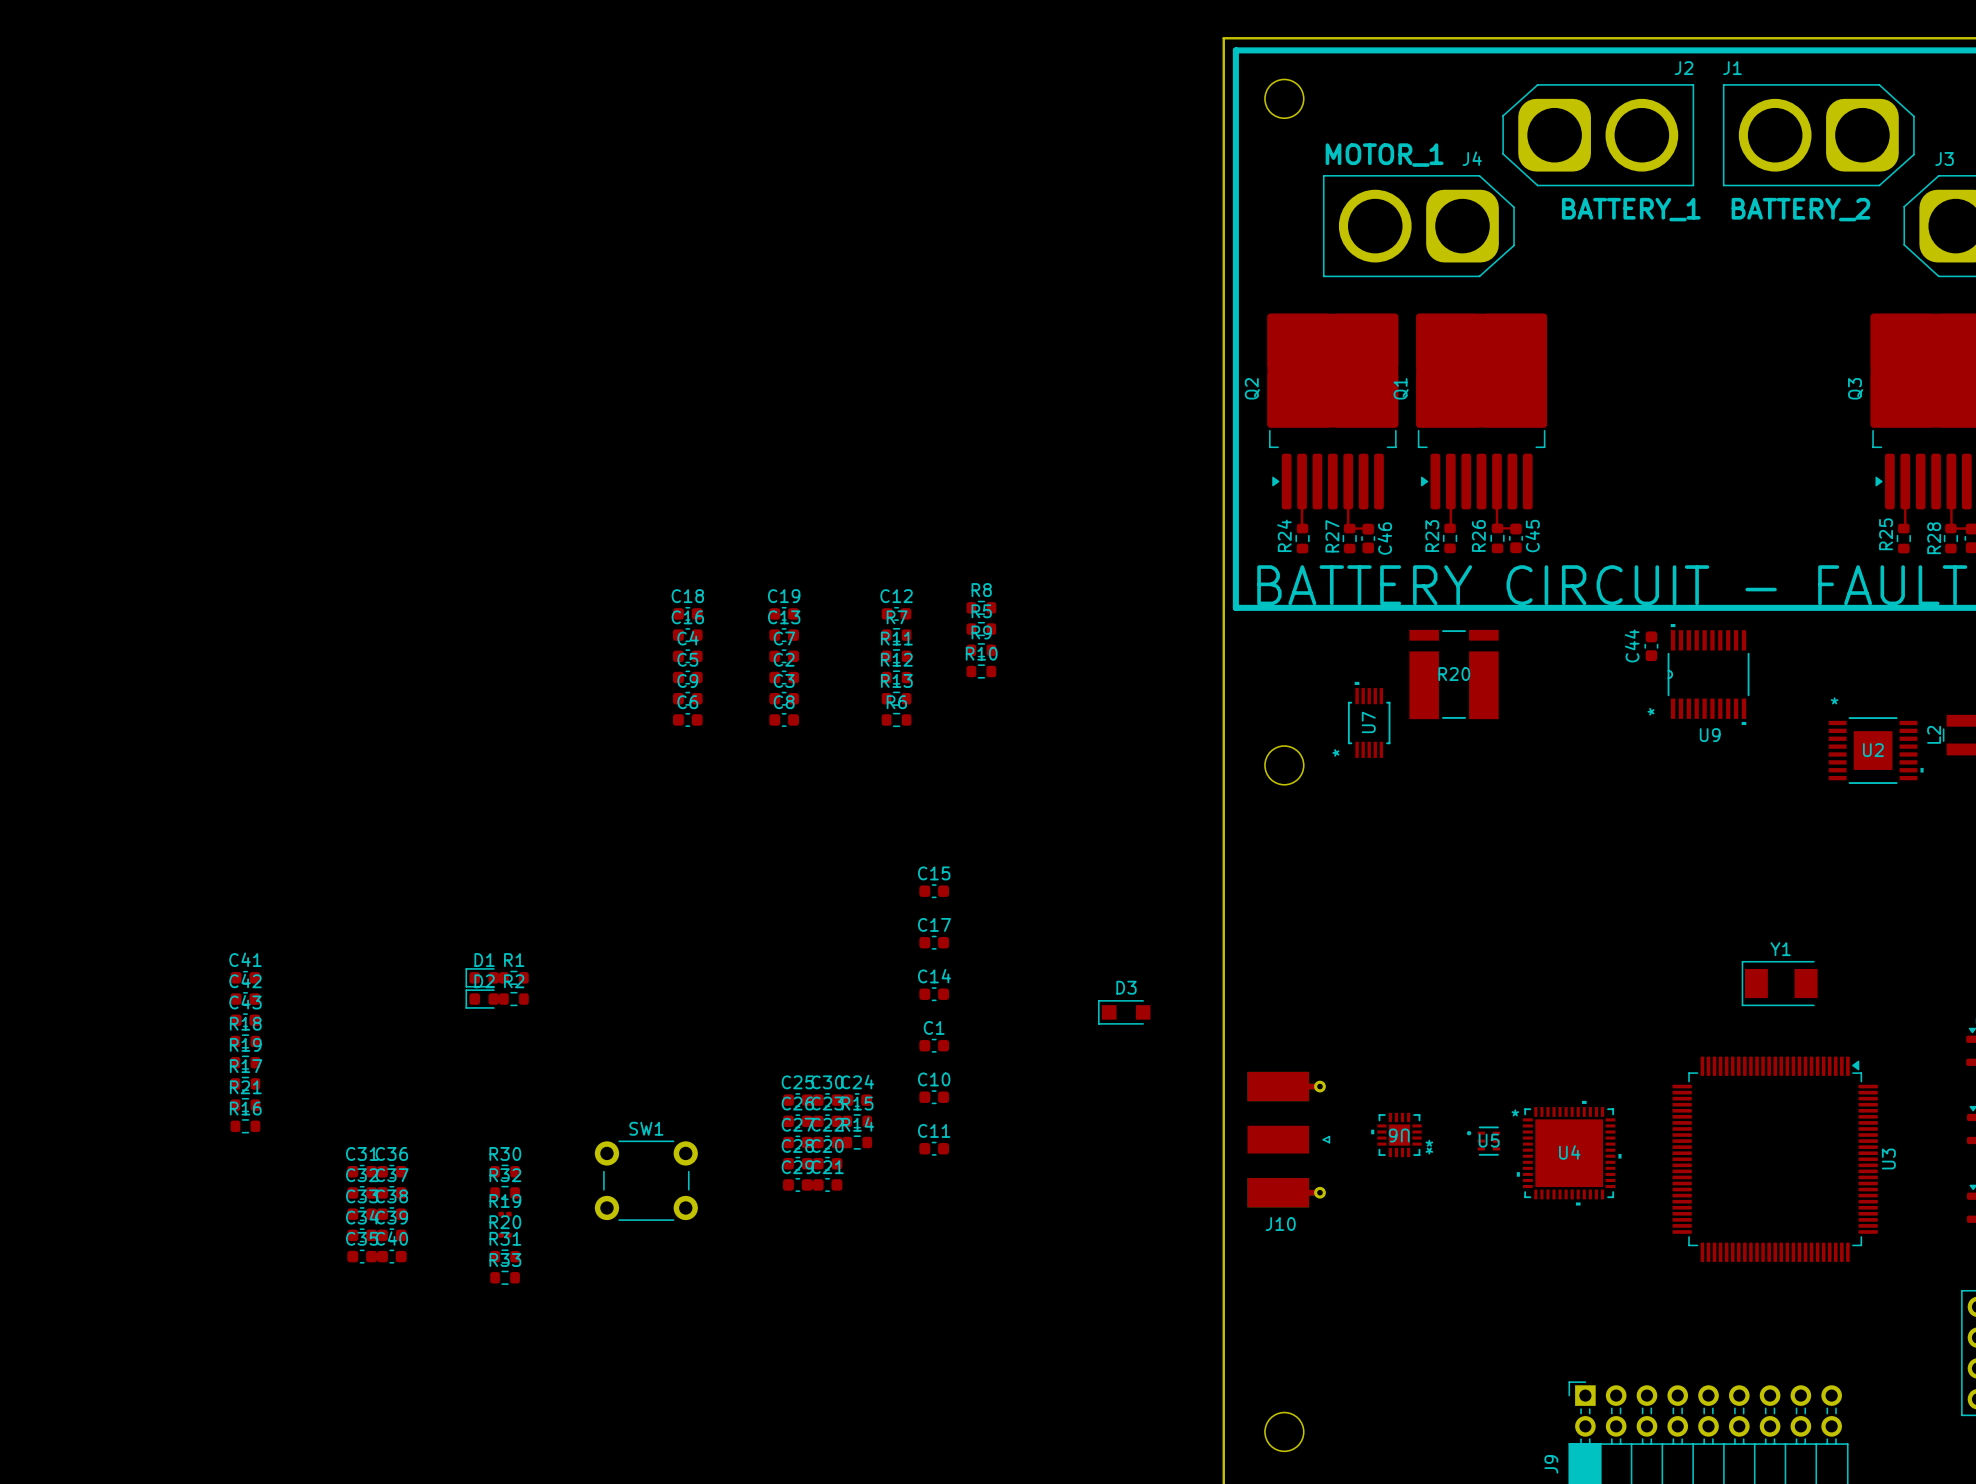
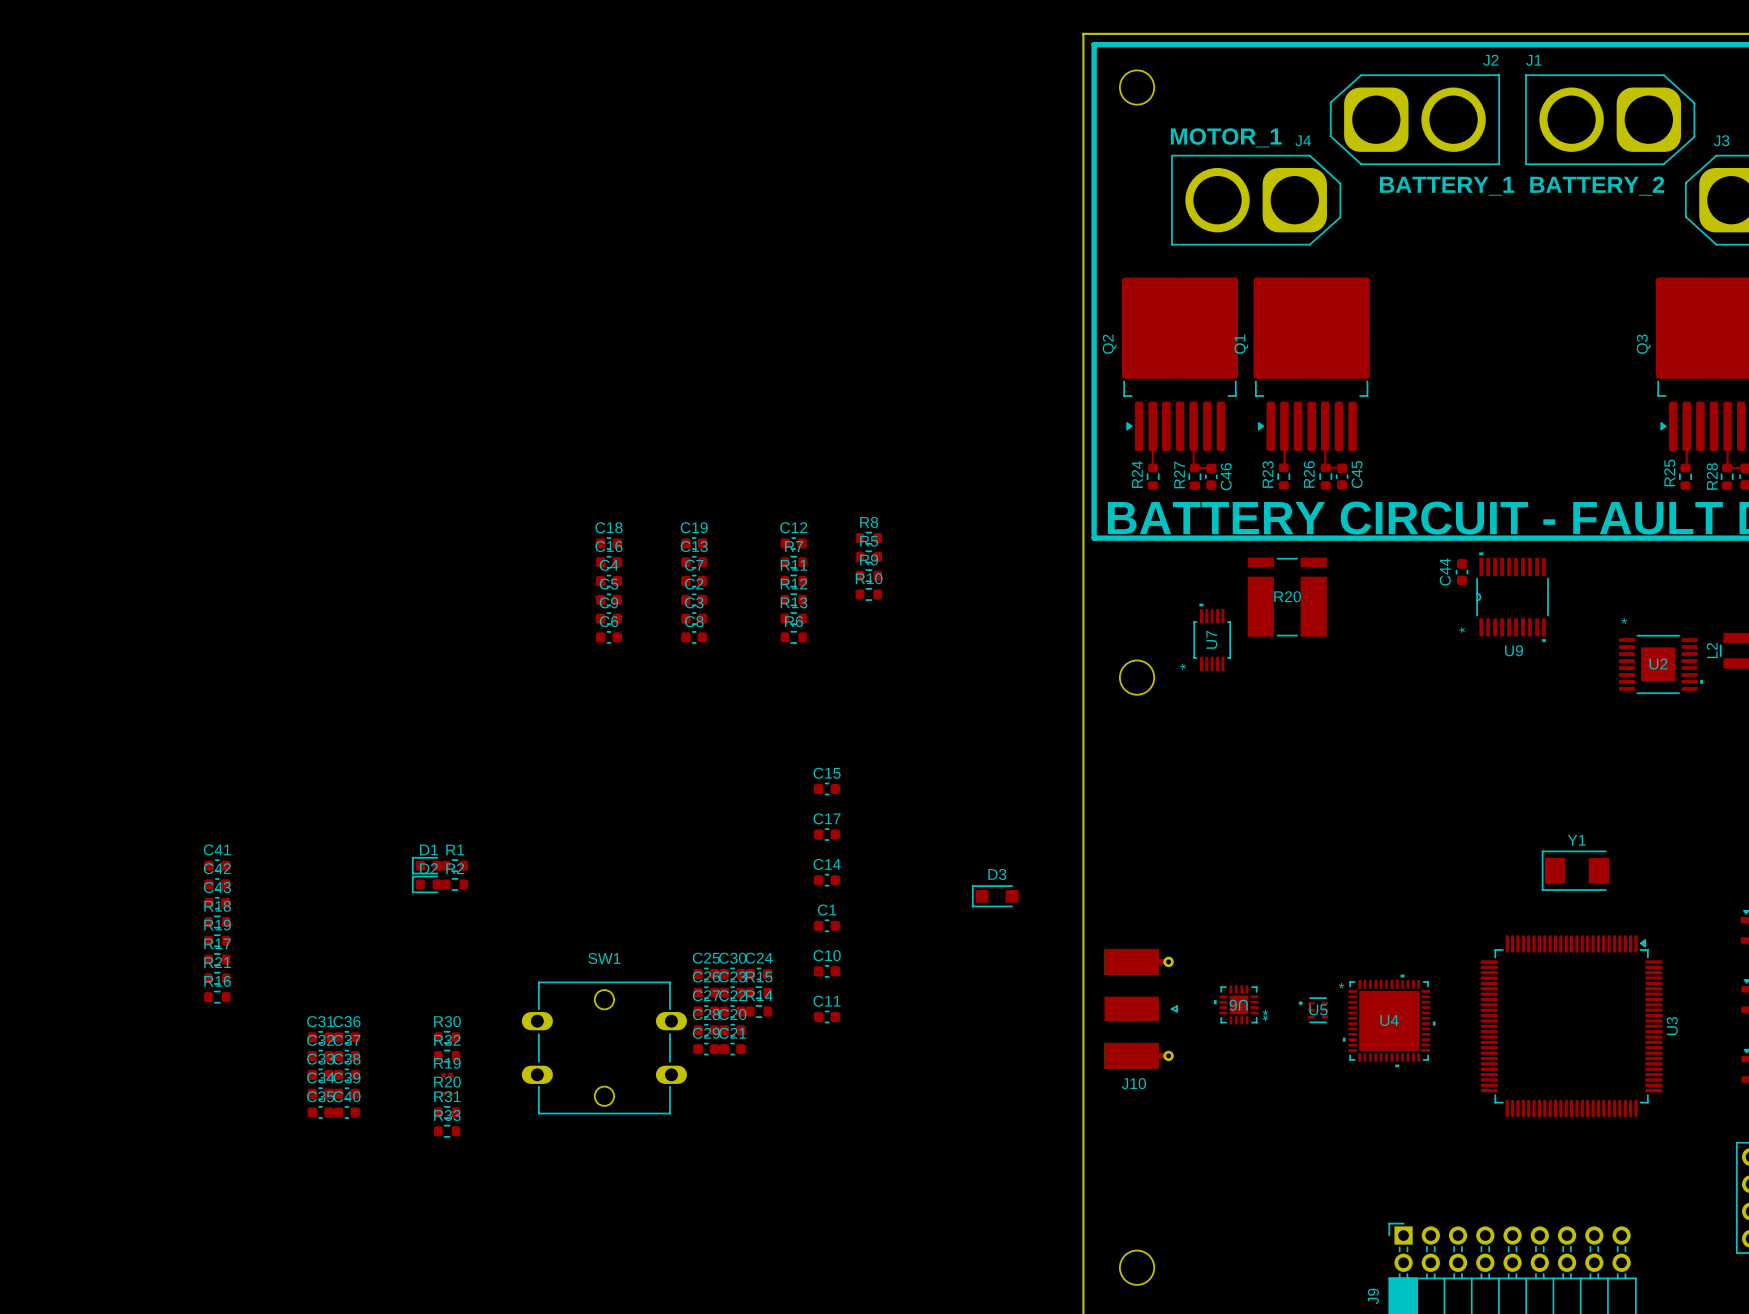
SW1 name position: SW1 (646, 1128) -> SW1 (604, 958)
SW1 footprint: [594, 1140, 698, 1221] -> [521, 981, 688, 1115]

